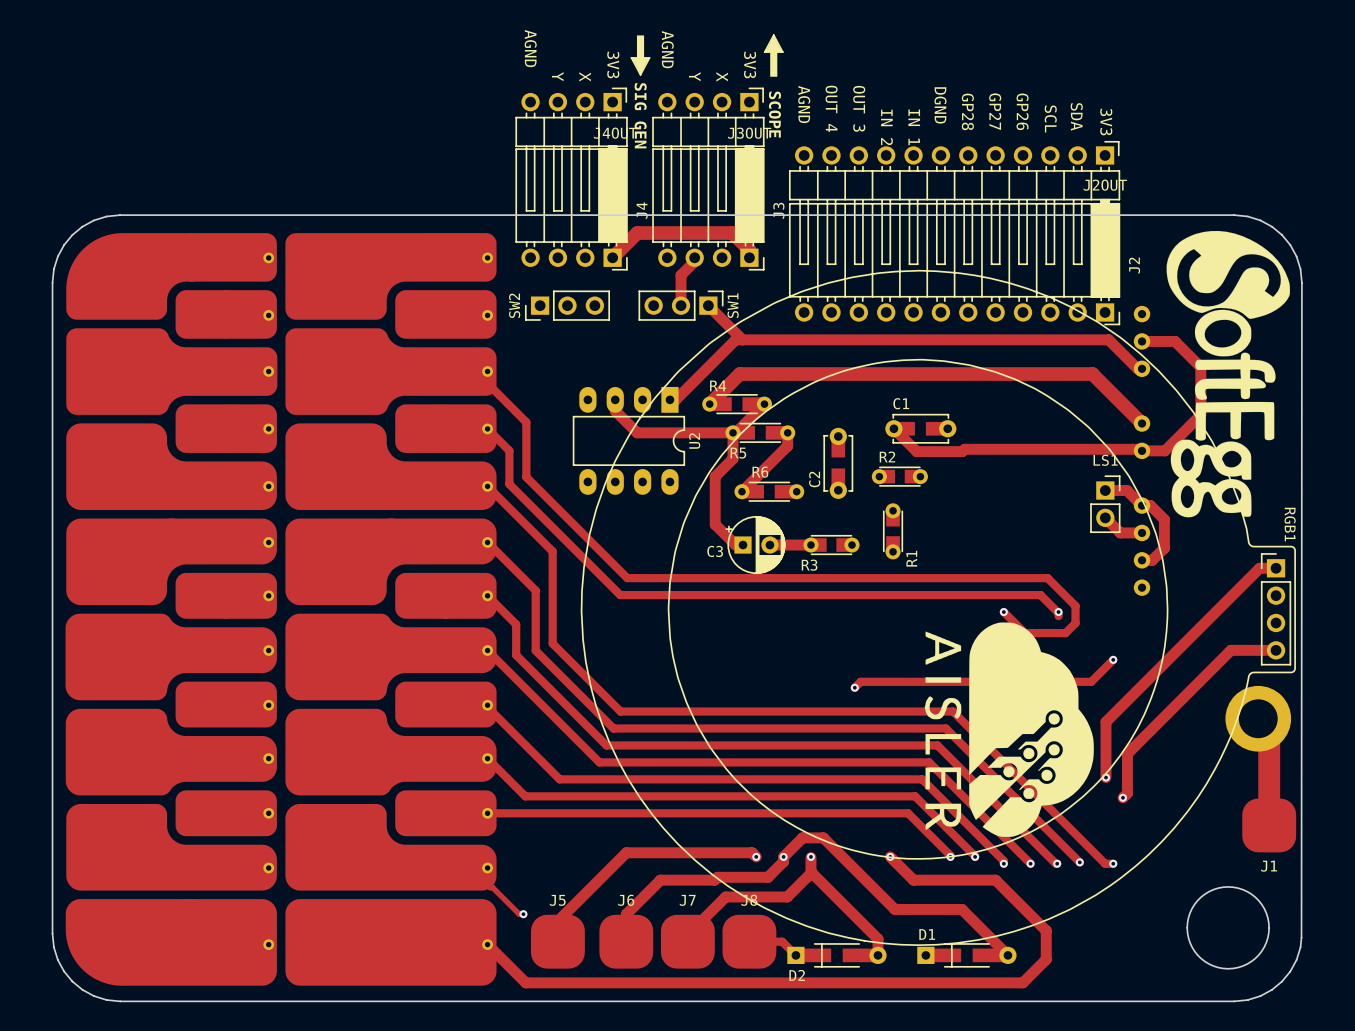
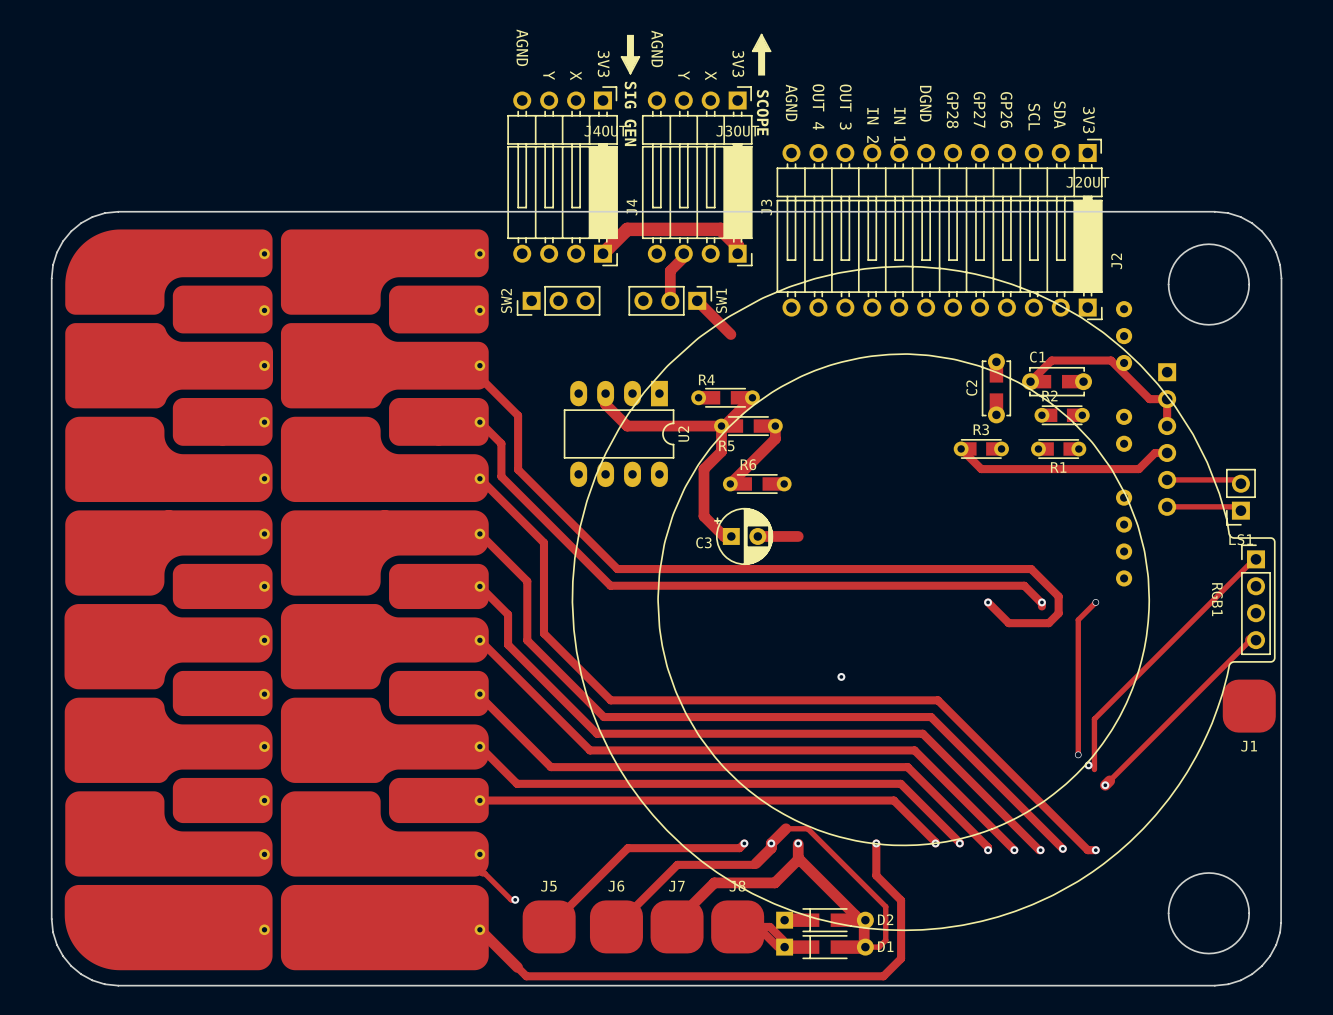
drawing: [1166, 230, 1290, 518] -> none
board edge: none -> (1168, 284) (1173, 303) (1182, 314) (1194, 322) (1208, 324) (1223, 322) (1239, 311) (1246, 298) (1249, 284) (1246, 269) (1237, 256) (1224, 247) (1208, 244) (1193, 247) (1180, 256) (1171, 269) (1168, 284)
track: (1142, 341) (1175, 341) (1200, 367) (1200, 415) (1165, 450) (964, 449) (962, 451) (916, 451) (893, 428) -> none
track: (1142, 368) (1137, 368) (1108, 339) (735, 339) (675, 399) (669, 399) -> none
track: none -> (1030, 381) (1051, 360) (1111, 360) (1149, 399) (1167, 399) (1167, 426)
track: (709, 404) (739, 374) (1092, 374) (1142, 423) -> none
C1 position: (920, 428) -> (1057, 381)
part: none -> (1167, 439)
track: none -> (961, 448) (981, 469) (1138, 469) (1155, 452) (1167, 452)
C2 position: (838, 463) -> (996, 388)
R2 position: (899, 476) -> (1062, 415)
C2 name position: C2 (814, 479) -> C2 (971, 388)
track: none -> (1167, 479) (1237, 479) (1240, 483)
track: (1105, 490) (1126, 490) (1142, 505) (1150, 505) (1164, 519) (1164, 548) (1152, 560) (1142, 560) -> none
LS1 rotation: 0° (1105, 504) -> 180° (1240, 497)
LS1 position: (1105, 504) -> (1240, 497)
track: none -> (1167, 506) (1237, 506) (1240, 510)
track: (1105, 517) (1120, 532) (1142, 532) -> none
RGB1 name position: RGB1 (1290, 524) -> RGB1 (1217, 599)
R1 rotation: 0° (893, 531) -> 90° clockwise (1058, 449)
R1 position: (893, 531) -> (1058, 449)
R3 position: (831, 545) -> (981, 448)
R3 name position: R3 (809, 565) -> R3 (981, 429)
track: none -> (1254, 559) (1094, 719) (1094, 769)
track: (1276, 568) (1259, 568) (1105, 721) (1105, 777) -> none
track: none -> (1095, 602) (1078, 619) (1078, 754)
via: none -> (1095, 602)
drawing: [924, 622, 1094, 837] -> none
track: (1270, 650) (1230, 650) (1127, 753) (1127, 793) -> (1250, 640) (1109, 780)
track: (1113, 659) (1091, 681) (860, 681) (854, 687) -> none
via: (1113, 659) -> none
track: (1258, 718) (1269, 729) (1269, 825) (1271, 822) -> none
part: (1258, 718) -> none
via: none -> (1078, 754)
J1 position: (1269, 825) -> (1249, 706)
track: (798, 841) (802, 837) (823, 837) (894, 909) (961, 909) (1007, 955) -> (785, 828) (807, 828) (885, 906) (885, 940) (879, 947) (865, 947)
track: (756, 856) (752, 852) (626, 852) (557, 921) (557, 941) -> (744, 843) (739, 848) (627, 848) (549, 926)
track: (890, 856) (913, 880) (995, 880) (1046, 930) (1046, 959) (1022, 982) (525, 982) -> (876, 843) (876, 875) (901, 900) (901, 958) (883, 976) (526, 976) (517, 967)
track: (768, 877) (660, 880) (626, 914) (626, 940) -> (755, 863) (677, 864) (616, 925)
D1 name position: D1 (927, 934) -> D1 (885, 946)
track: none -> (757, 926) (777, 947)
D2 position: (836, 955) -> (825, 920)
D1 position: (966, 955) -> (825, 947)
D2 name position: D2 (797, 975) -> D2 (885, 919)

